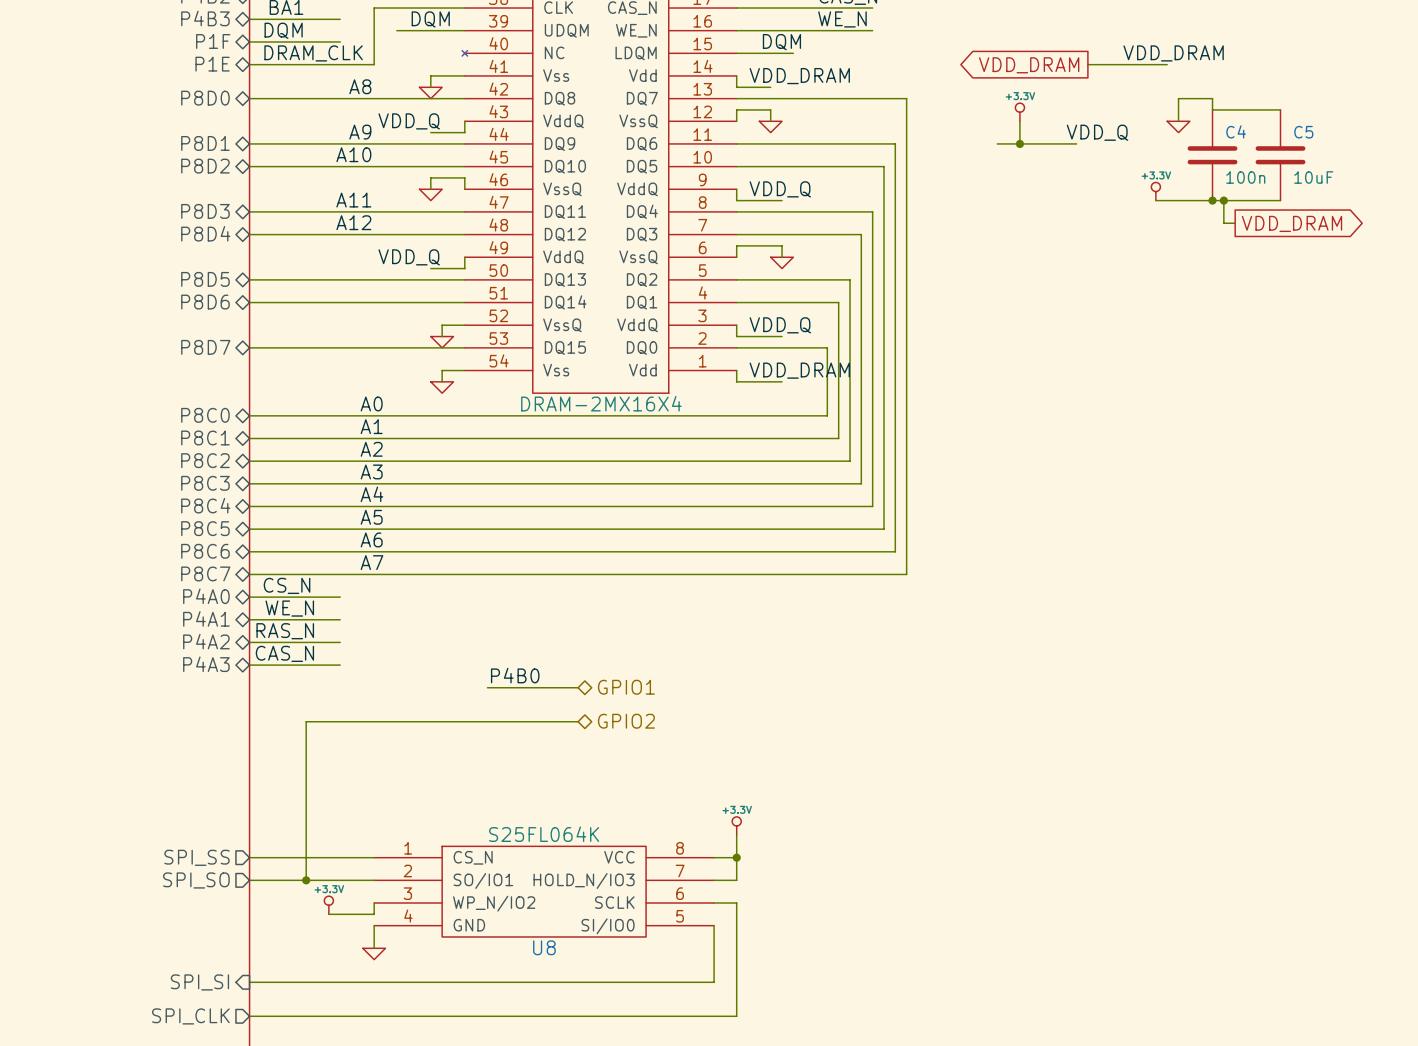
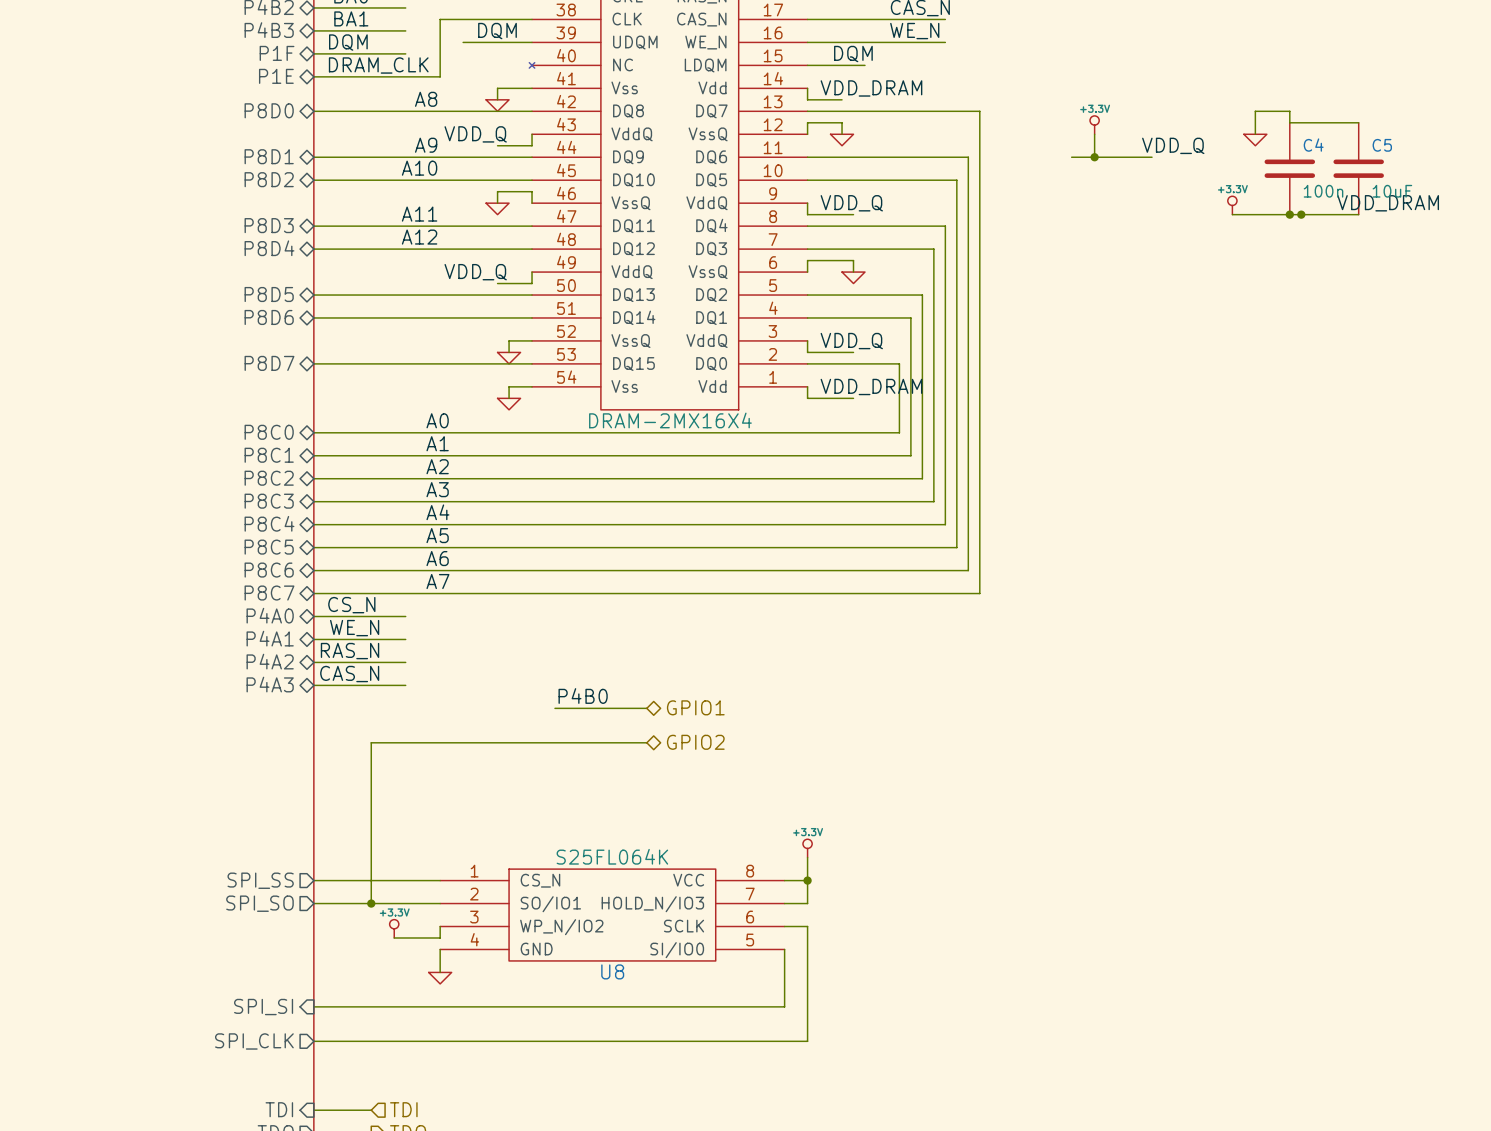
label position: VDD_DRAM (1173, 53) -> VDD_DRAM (1388, 203)
wire: (1087, 64) (1167, 64) -> none
global label: VDD_DRAM (1029, 65) -> none
wire: (1223, 200) (1223, 223) (1235, 223) -> none
global label: VDD_DRAM (1291, 223) -> none

